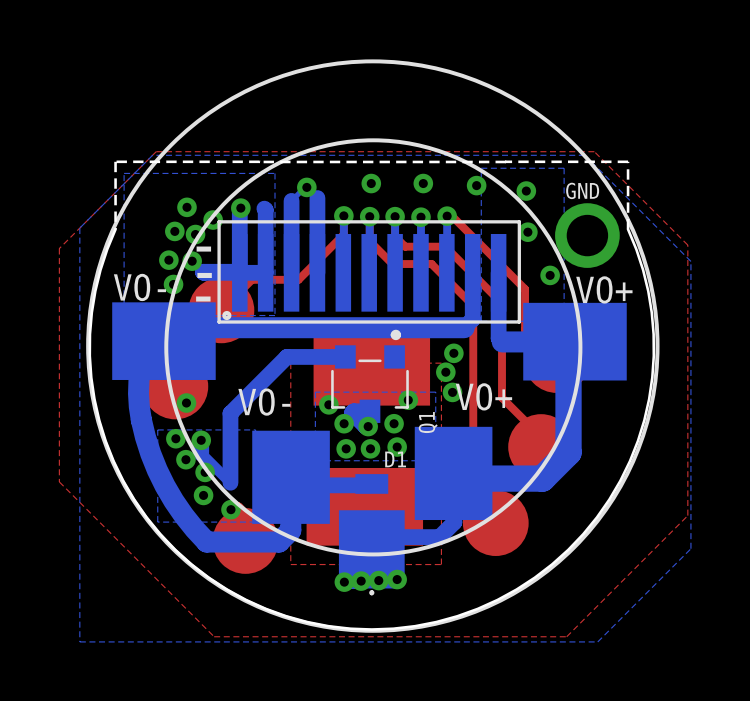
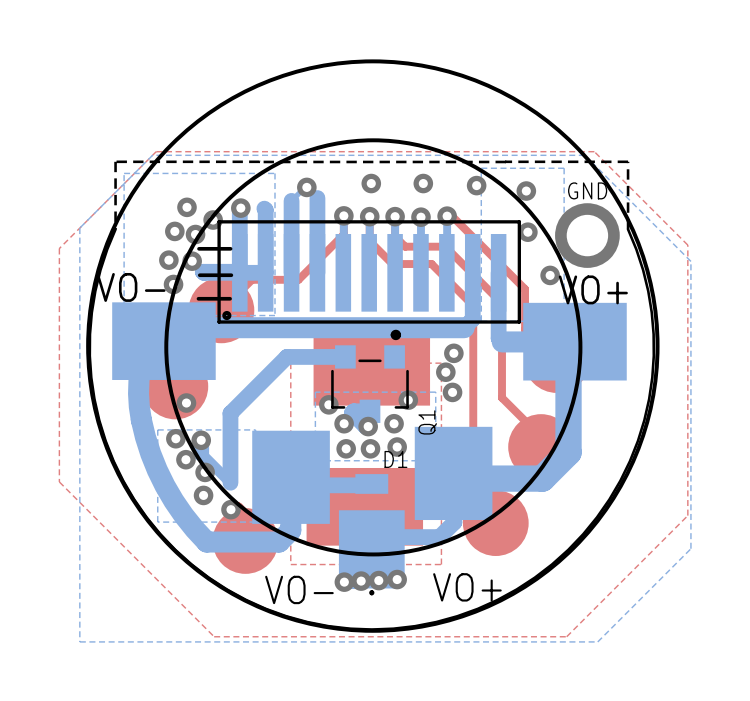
text position: VO+ (483, 396) -> VO+ (467, 587)
text position: VO- (264, 402) -> VO- (299, 589)

